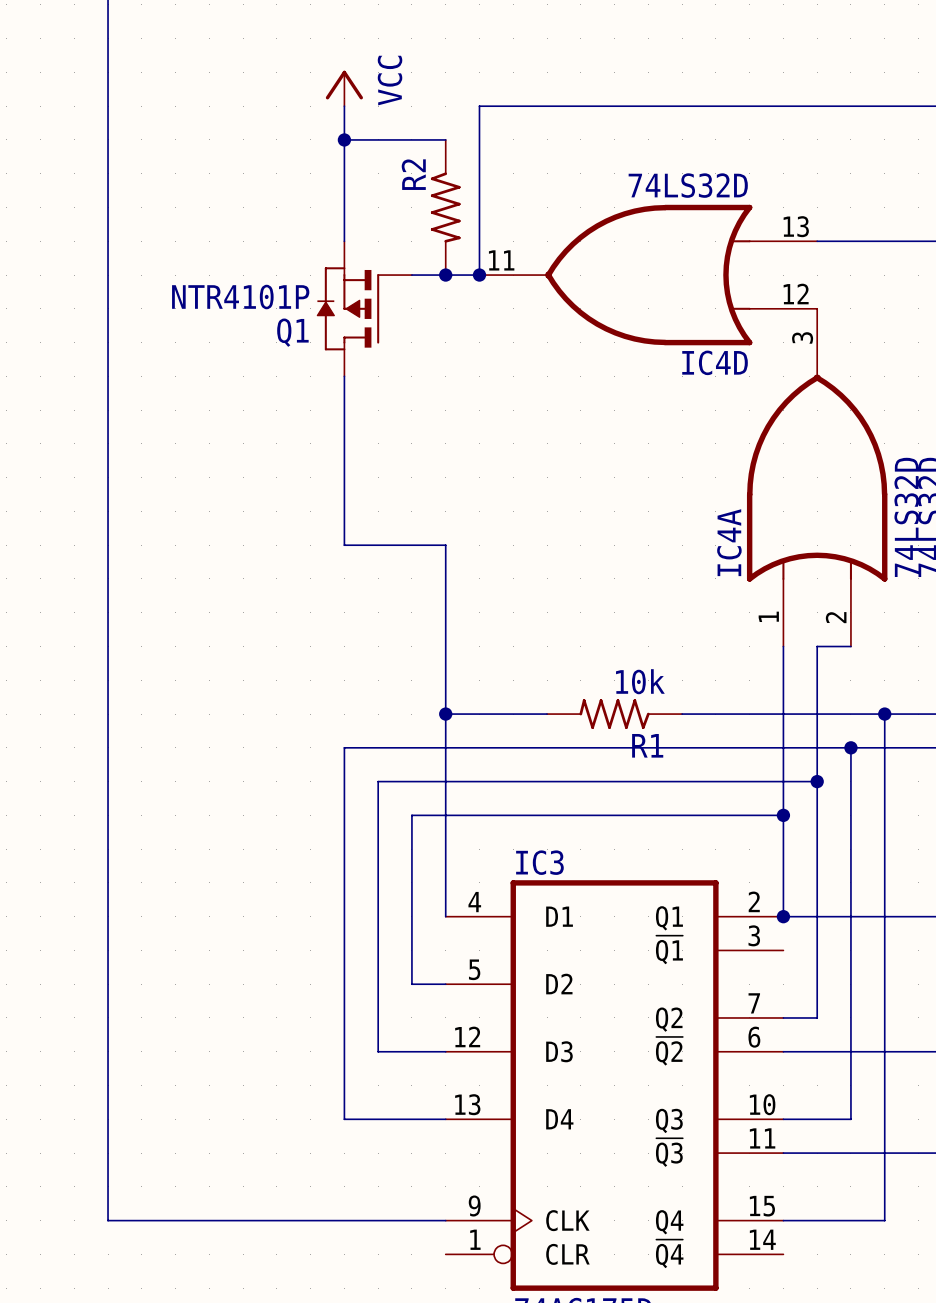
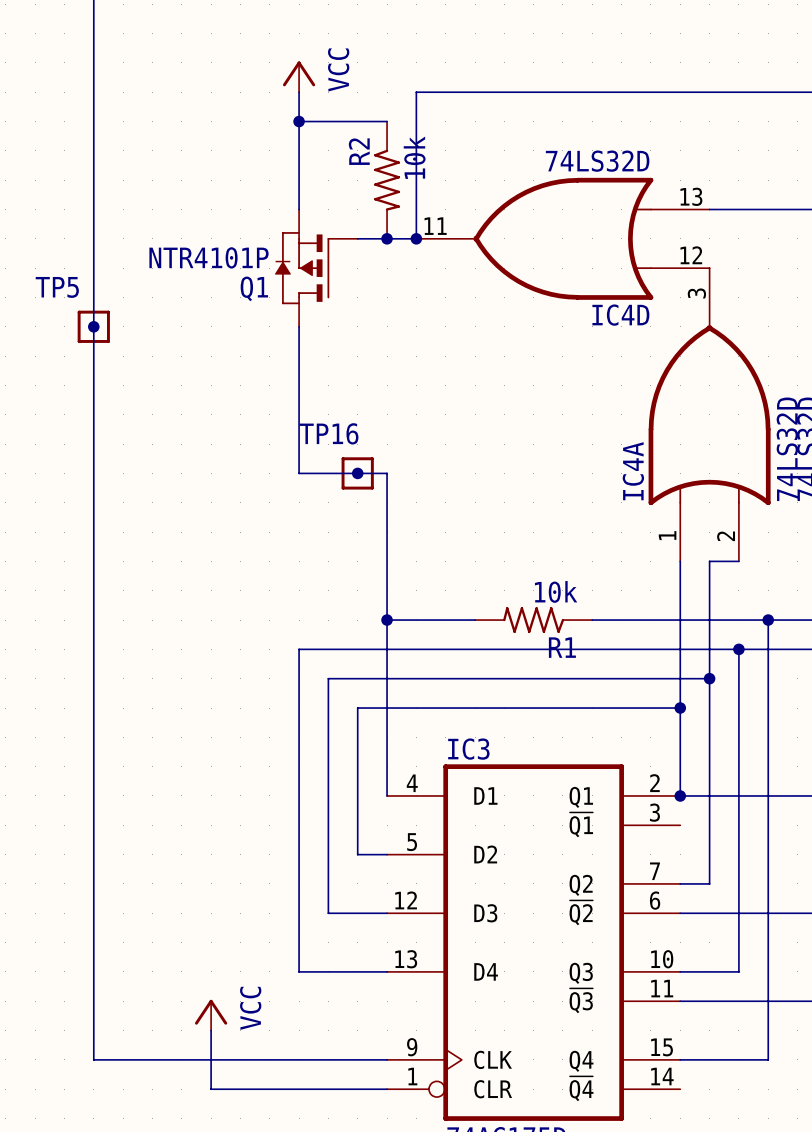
R2 value: none -> 10k (414, 157)
TP5: none -> (93, 326)
junction: none -> (93, 326)
TP16: none -> (357, 473)
junction: none -> (357, 473)
power symbol: none -> VCC (211, 1015)
wire: none -> (211, 1030) (211, 1089) (387, 1089)

